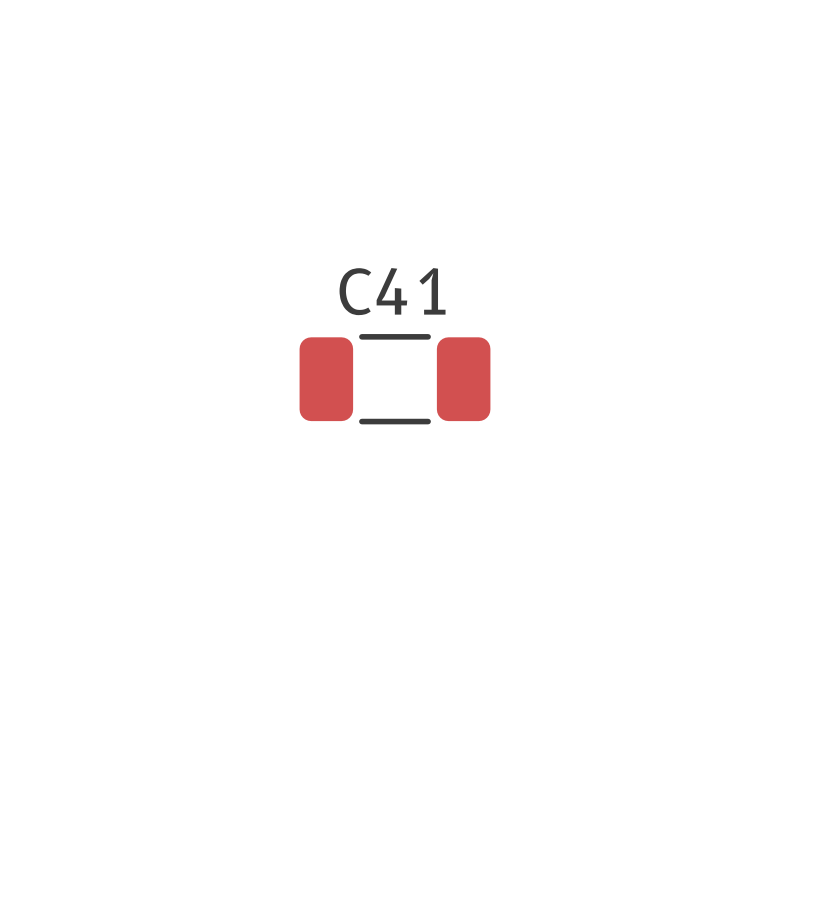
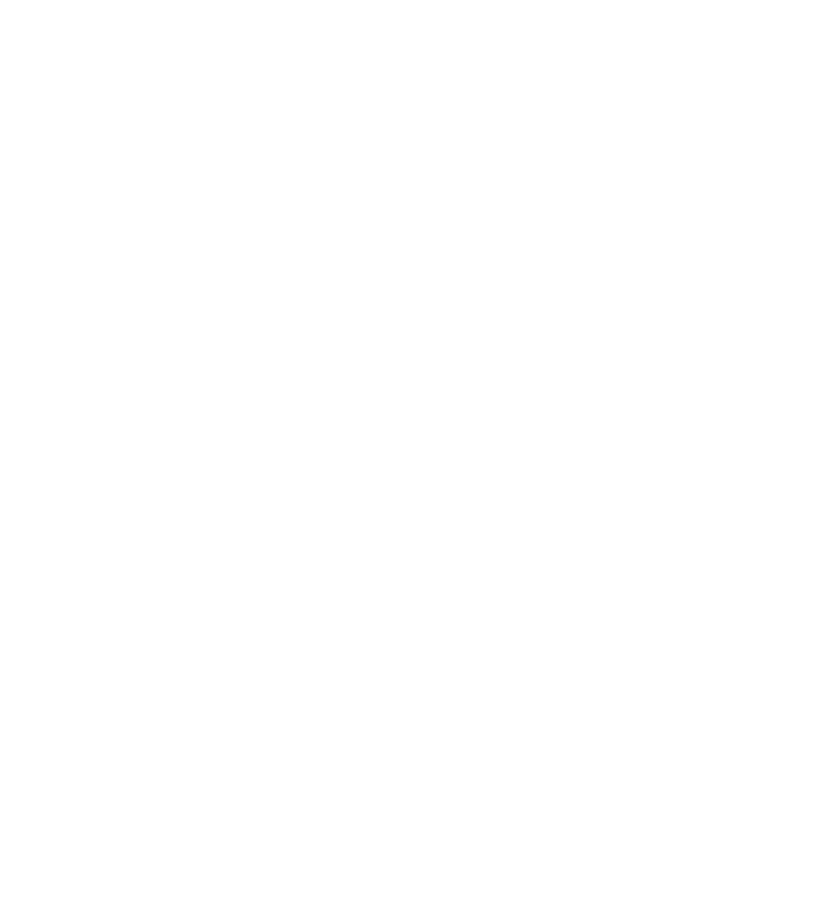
C41: (395, 379) -> none

